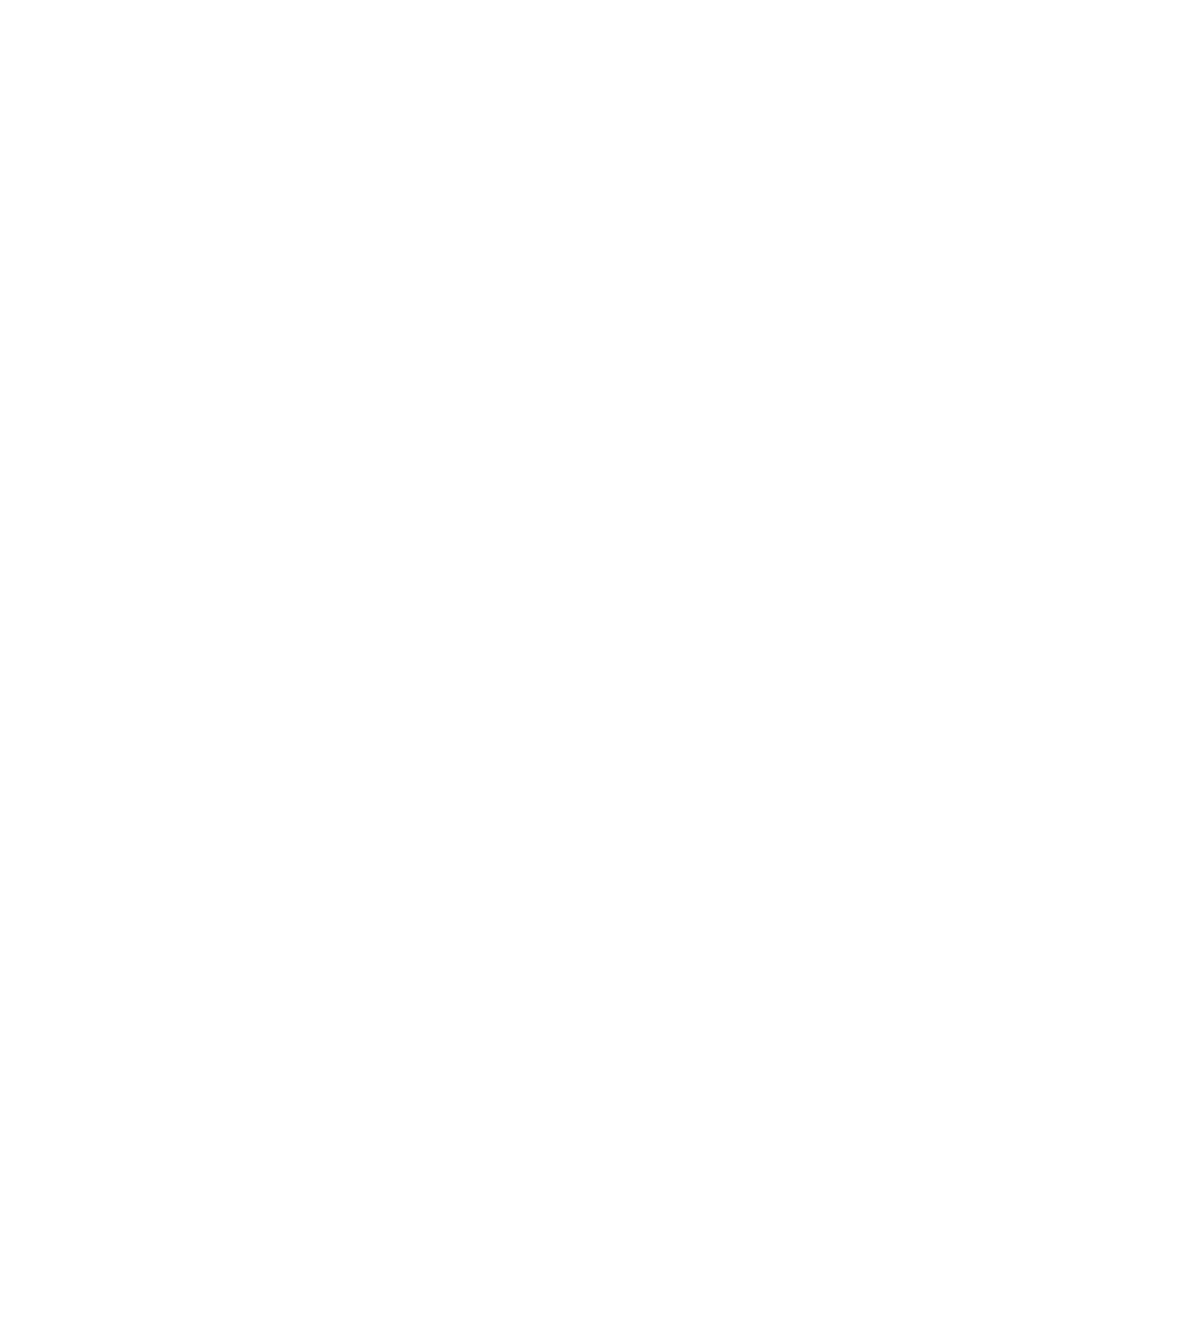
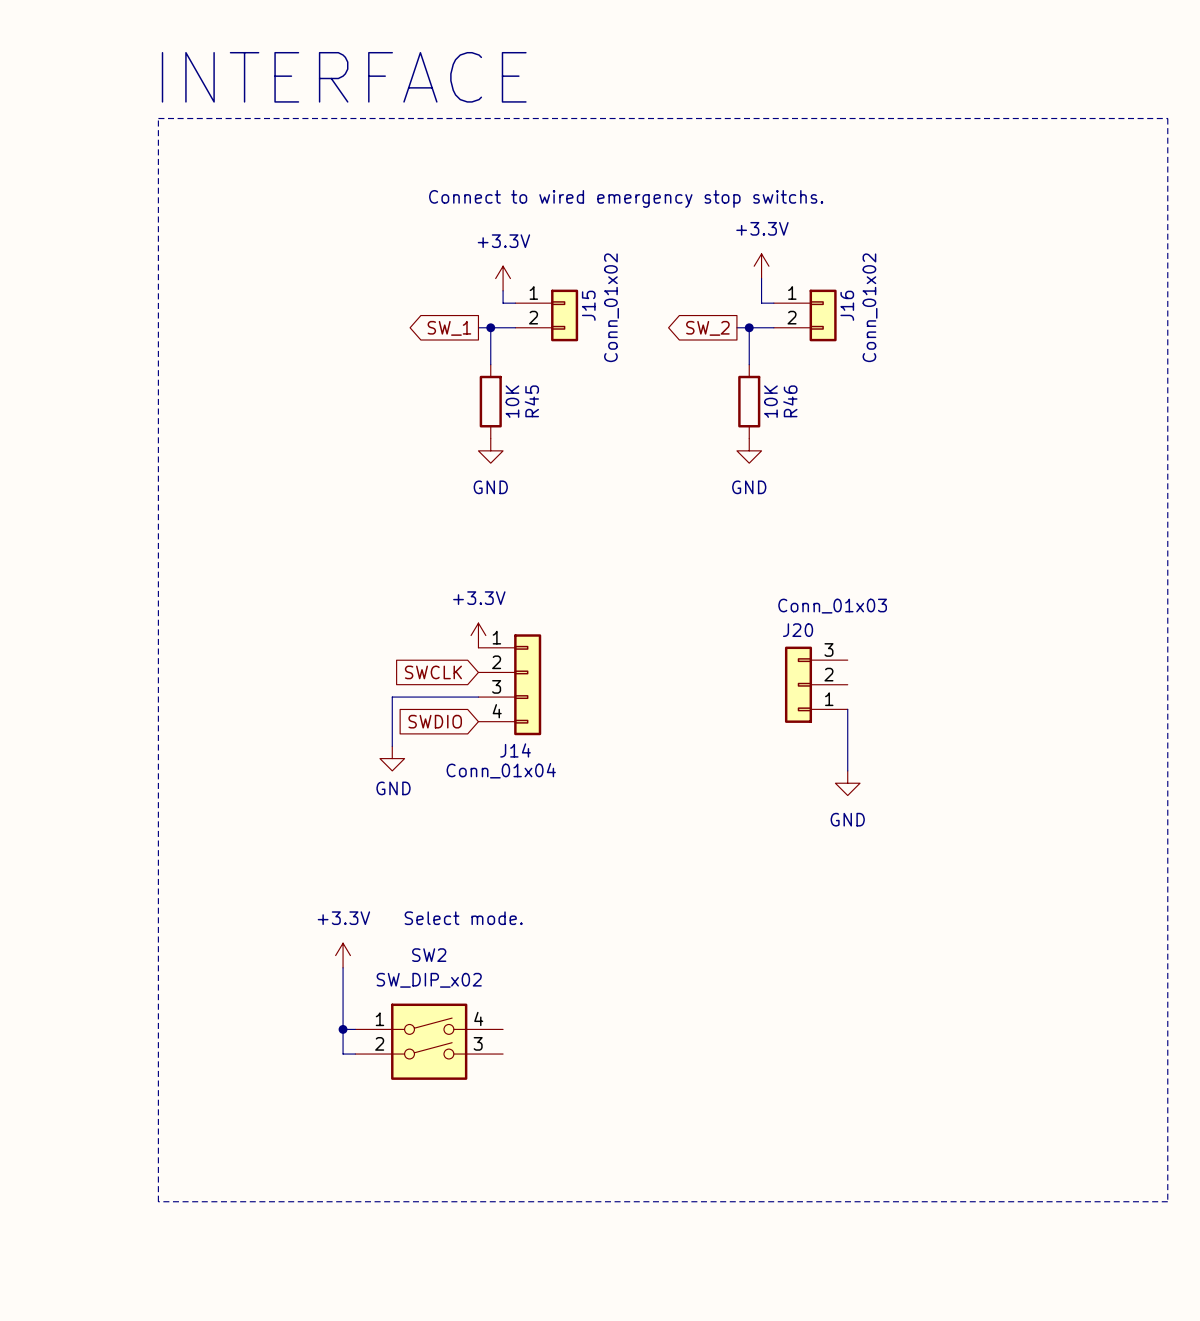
text: none -> INTERFACE (344, 77)
line: none -> (158, 118) (1167, 118) (1167, 1201) (158, 1201) (158, 118)
text: none -> Connect to wired emergency stop switchs. (626, 198)
power symbol: none -> +3.3V (761, 266)
power symbol: none -> +3.3V (503, 278)
wire: none -> (761, 278) (761, 303) (773, 303)
wire: none -> (503, 290) (503, 303) (515, 303)
J15: none -> Conn_01x02 (546, 315)
J16: none -> Conn_01x02 (805, 315)
wire: none -> (478, 327) (515, 327)
wire: none -> (490, 327) (490, 364)
junction: none -> (490, 327)
wire: none -> (736, 327) (773, 327)
wire: none -> (749, 327) (749, 364)
junction: none -> (749, 327)
global label: none -> SW_1 (449, 328)
global label: none -> SW_2 (707, 328)
R45: none -> 10K (490, 401)
R46: none -> 10K (749, 401)
power symbol: none -> GND (490, 450)
power symbol: none -> GND (749, 450)
power symbol: none -> +3.3V (478, 635)
global label: none -> SWCLK (433, 672)
J14: none -> Conn_01x04 (509, 684)
J20: none -> Conn_01x03 (816, 684)
wire: none -> (478, 697) (392, 697) (392, 746)
wire: none -> (847, 709) (847, 770)
global label: none -> SWDIO (435, 721)
power symbol: none -> GND (392, 758)
power symbol: none -> GND (847, 783)
text: none -> Select mode. (463, 918)
power symbol: none -> +3.3V (343, 955)
wire: none -> (343, 967) (343, 1054) (355, 1054)
wire: none -> (343, 1029) (355, 1029)
junction: none -> (343, 1029)
SW2: none -> SW_DIP_x02 (429, 1041)

